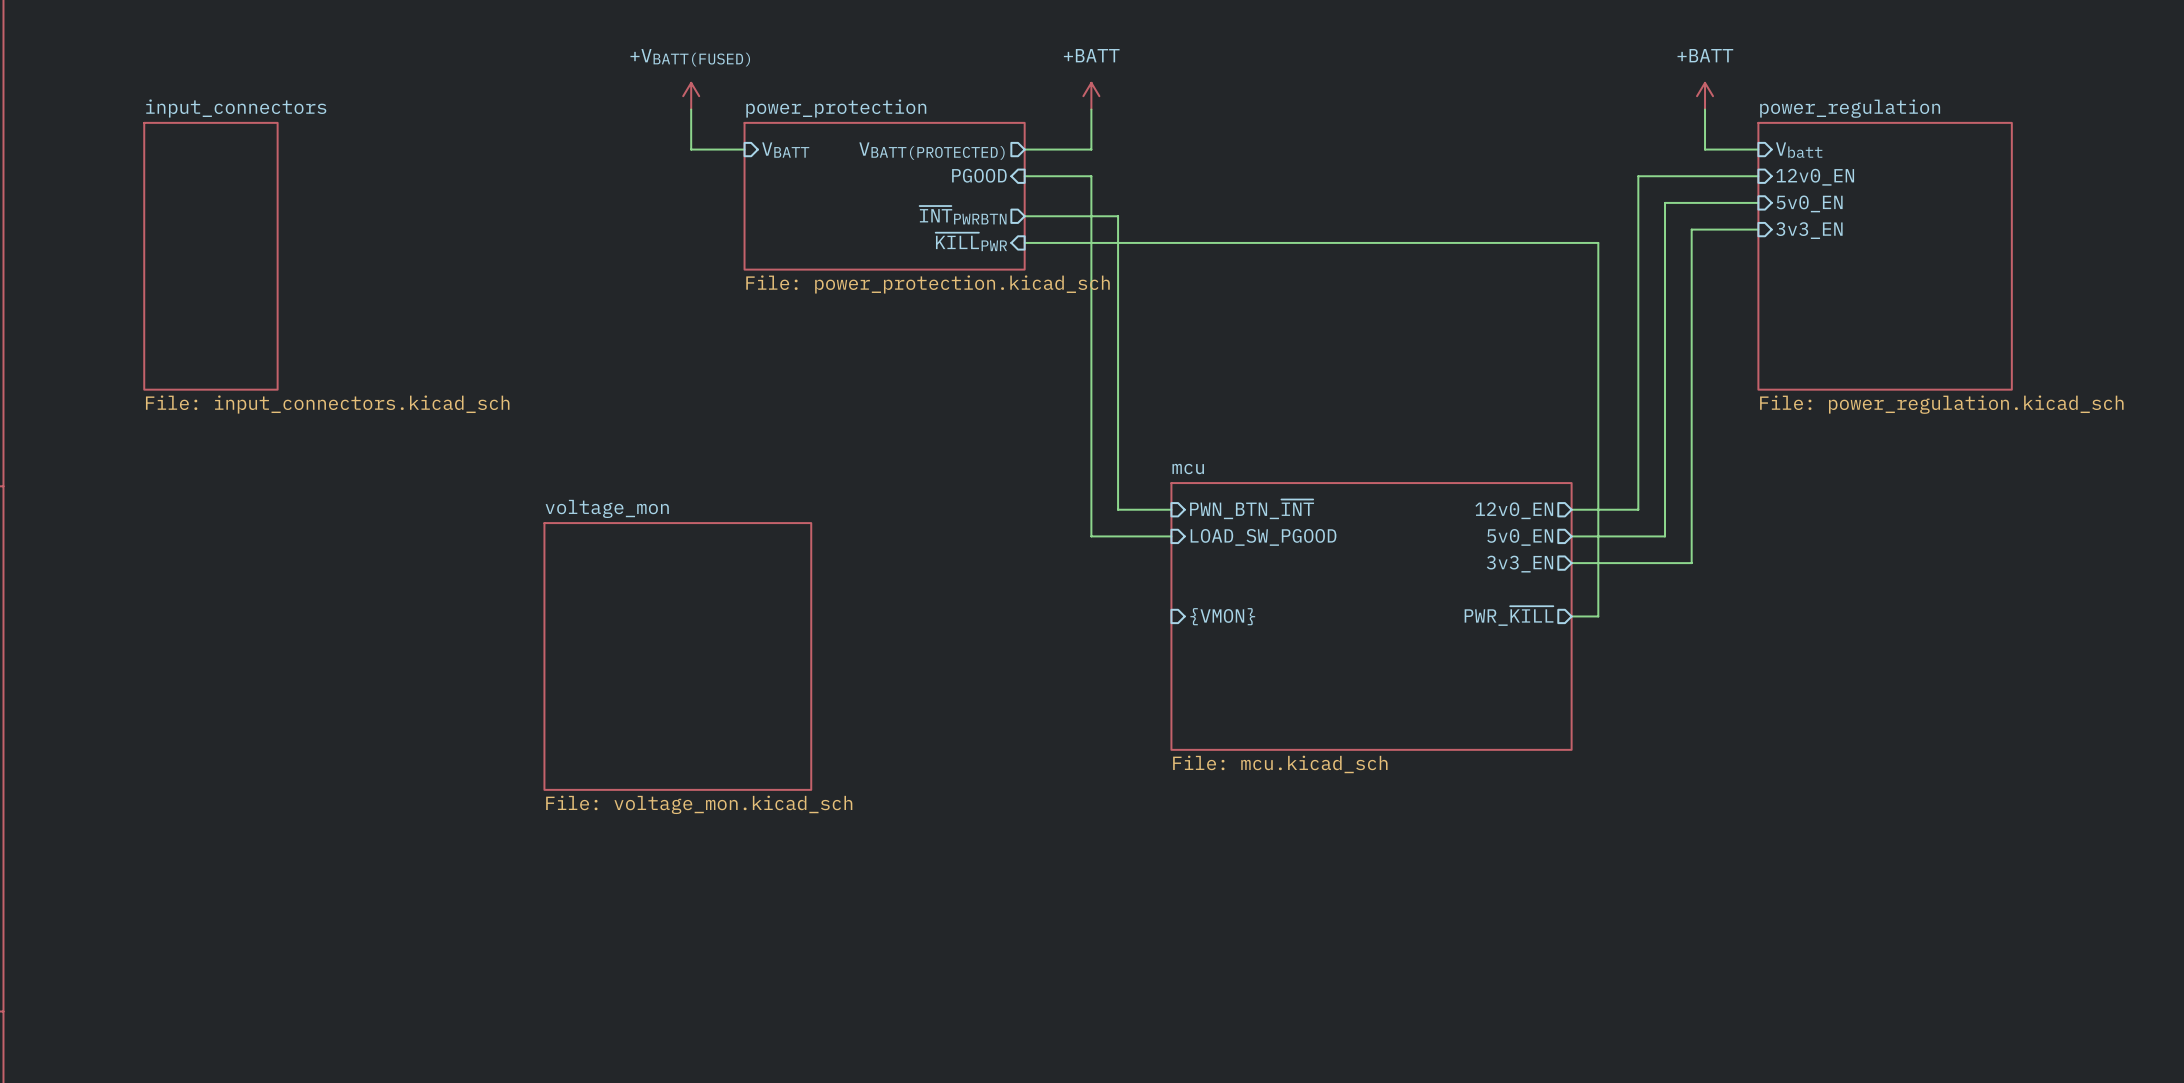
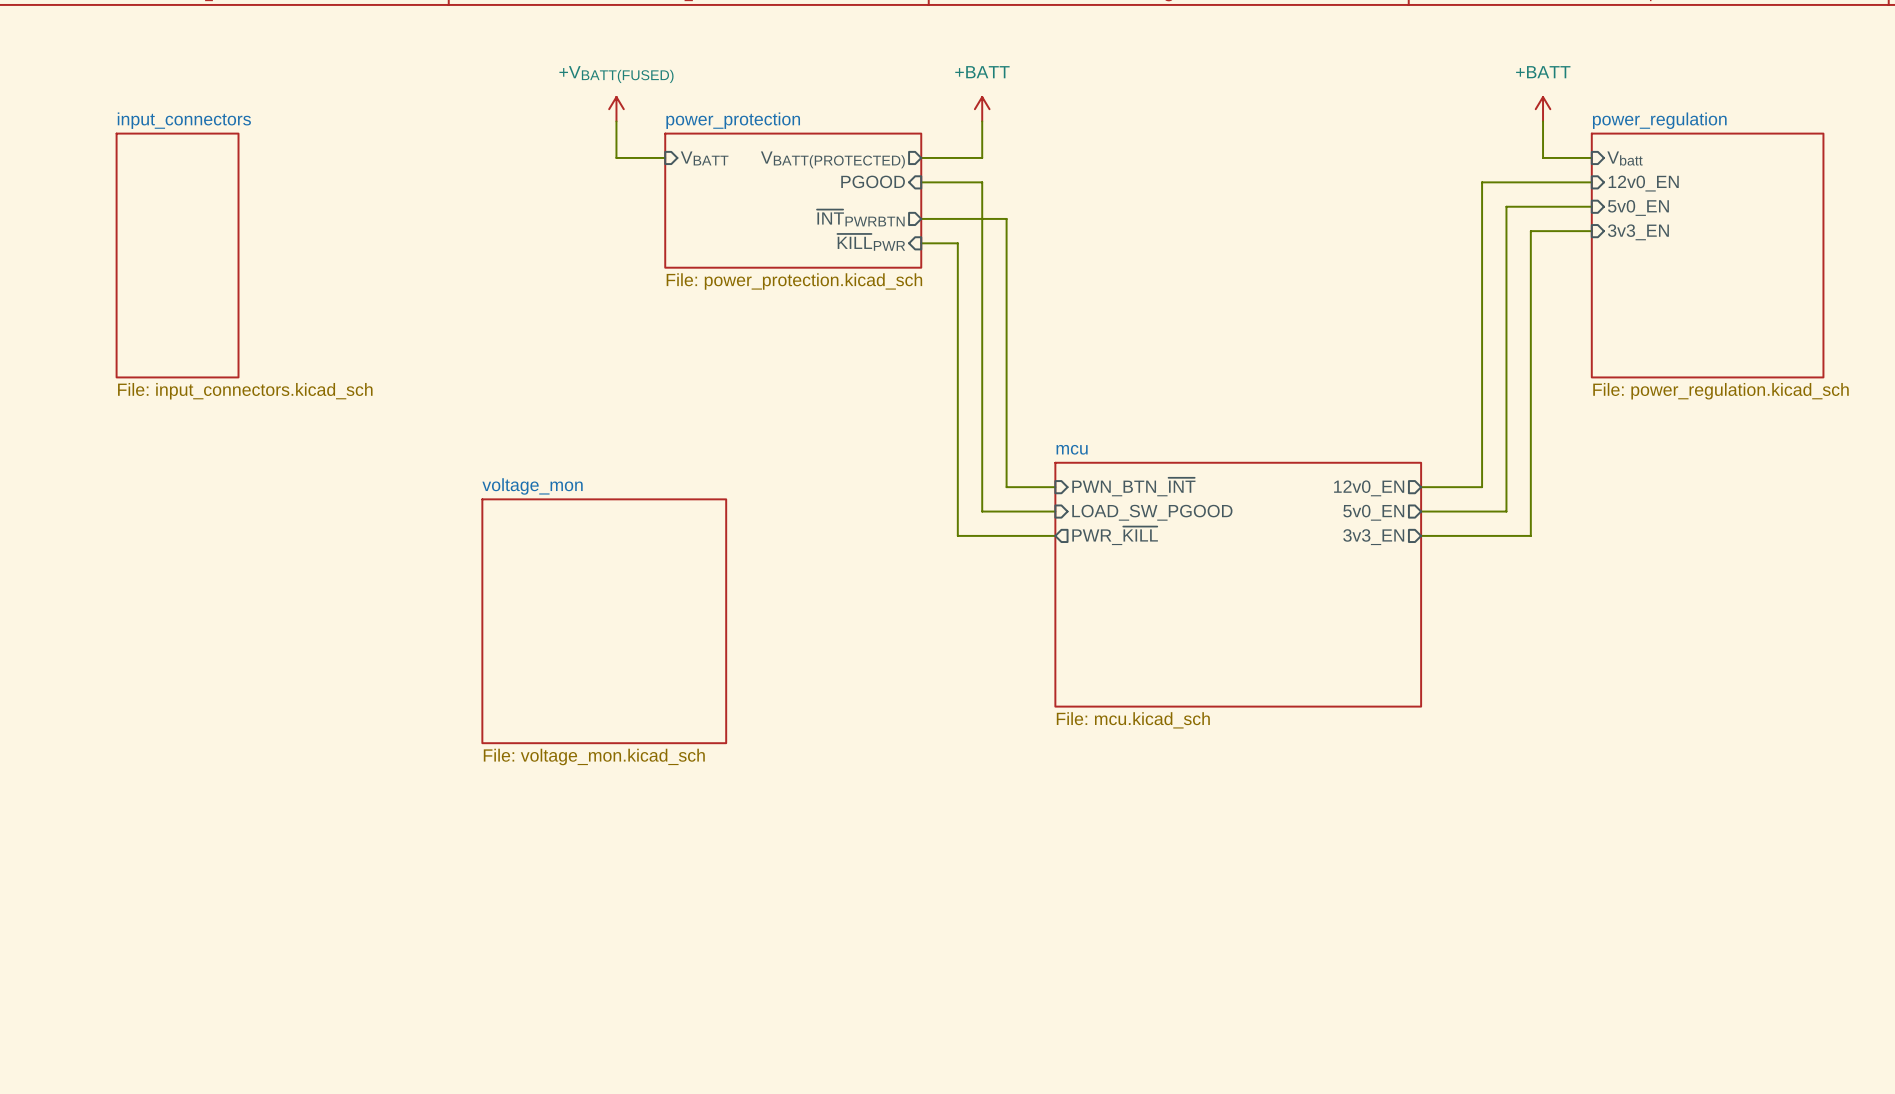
wire: (1064, 242) (1598, 242) (1598, 616) (1571, 616) -> (957, 243) (957, 535) (1055, 535)
sheet pin: none -> PWR_~{KILL} (1115, 535)
sheet pin: {VMON} (1222, 616) -> none
sheet pin: PWR_~{KILL} (1509, 616) -> none

